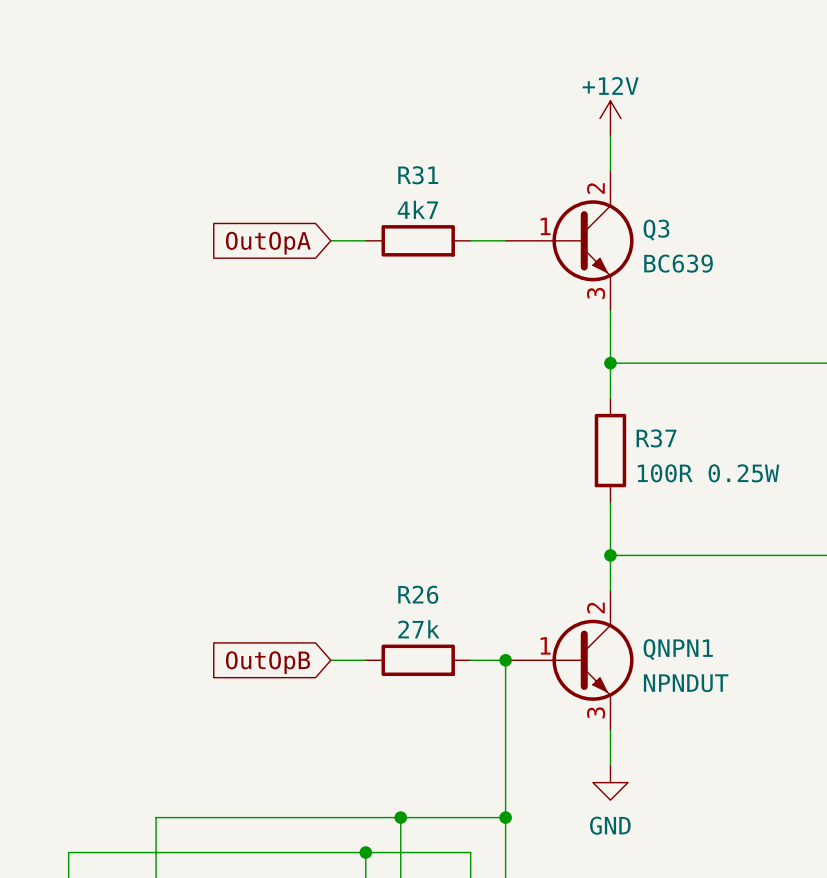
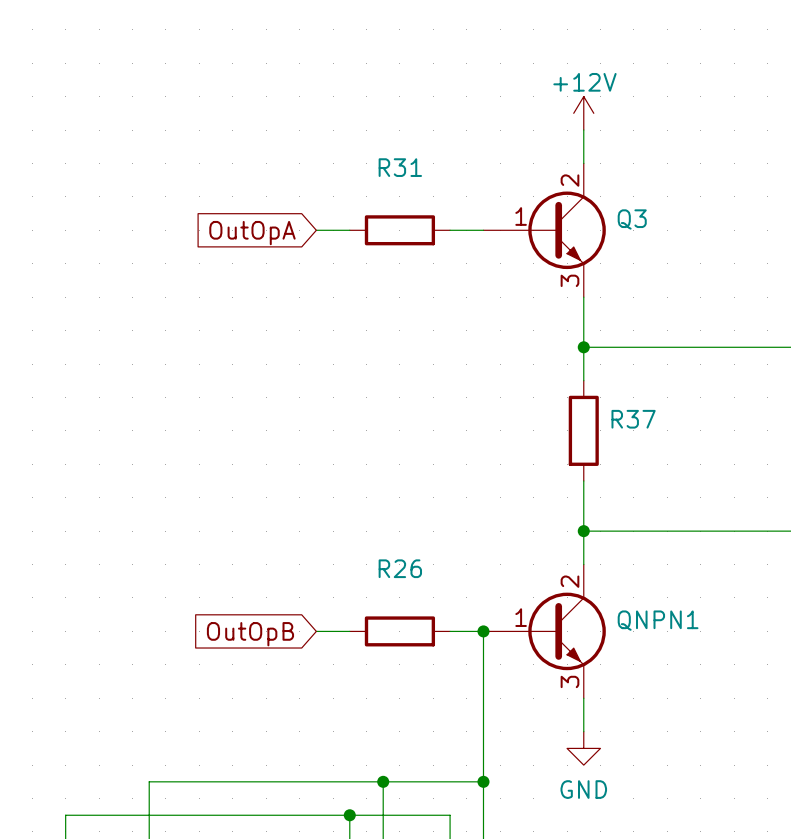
R31 value: 4k7 (417, 209) -> none
Q3 value: BC639 (678, 263) -> none
R37 value: 100R 0.25W (708, 473) -> none
R26 value: 27k (418, 629) -> none
QNPN1 value: NPNDUT (686, 683) -> none

